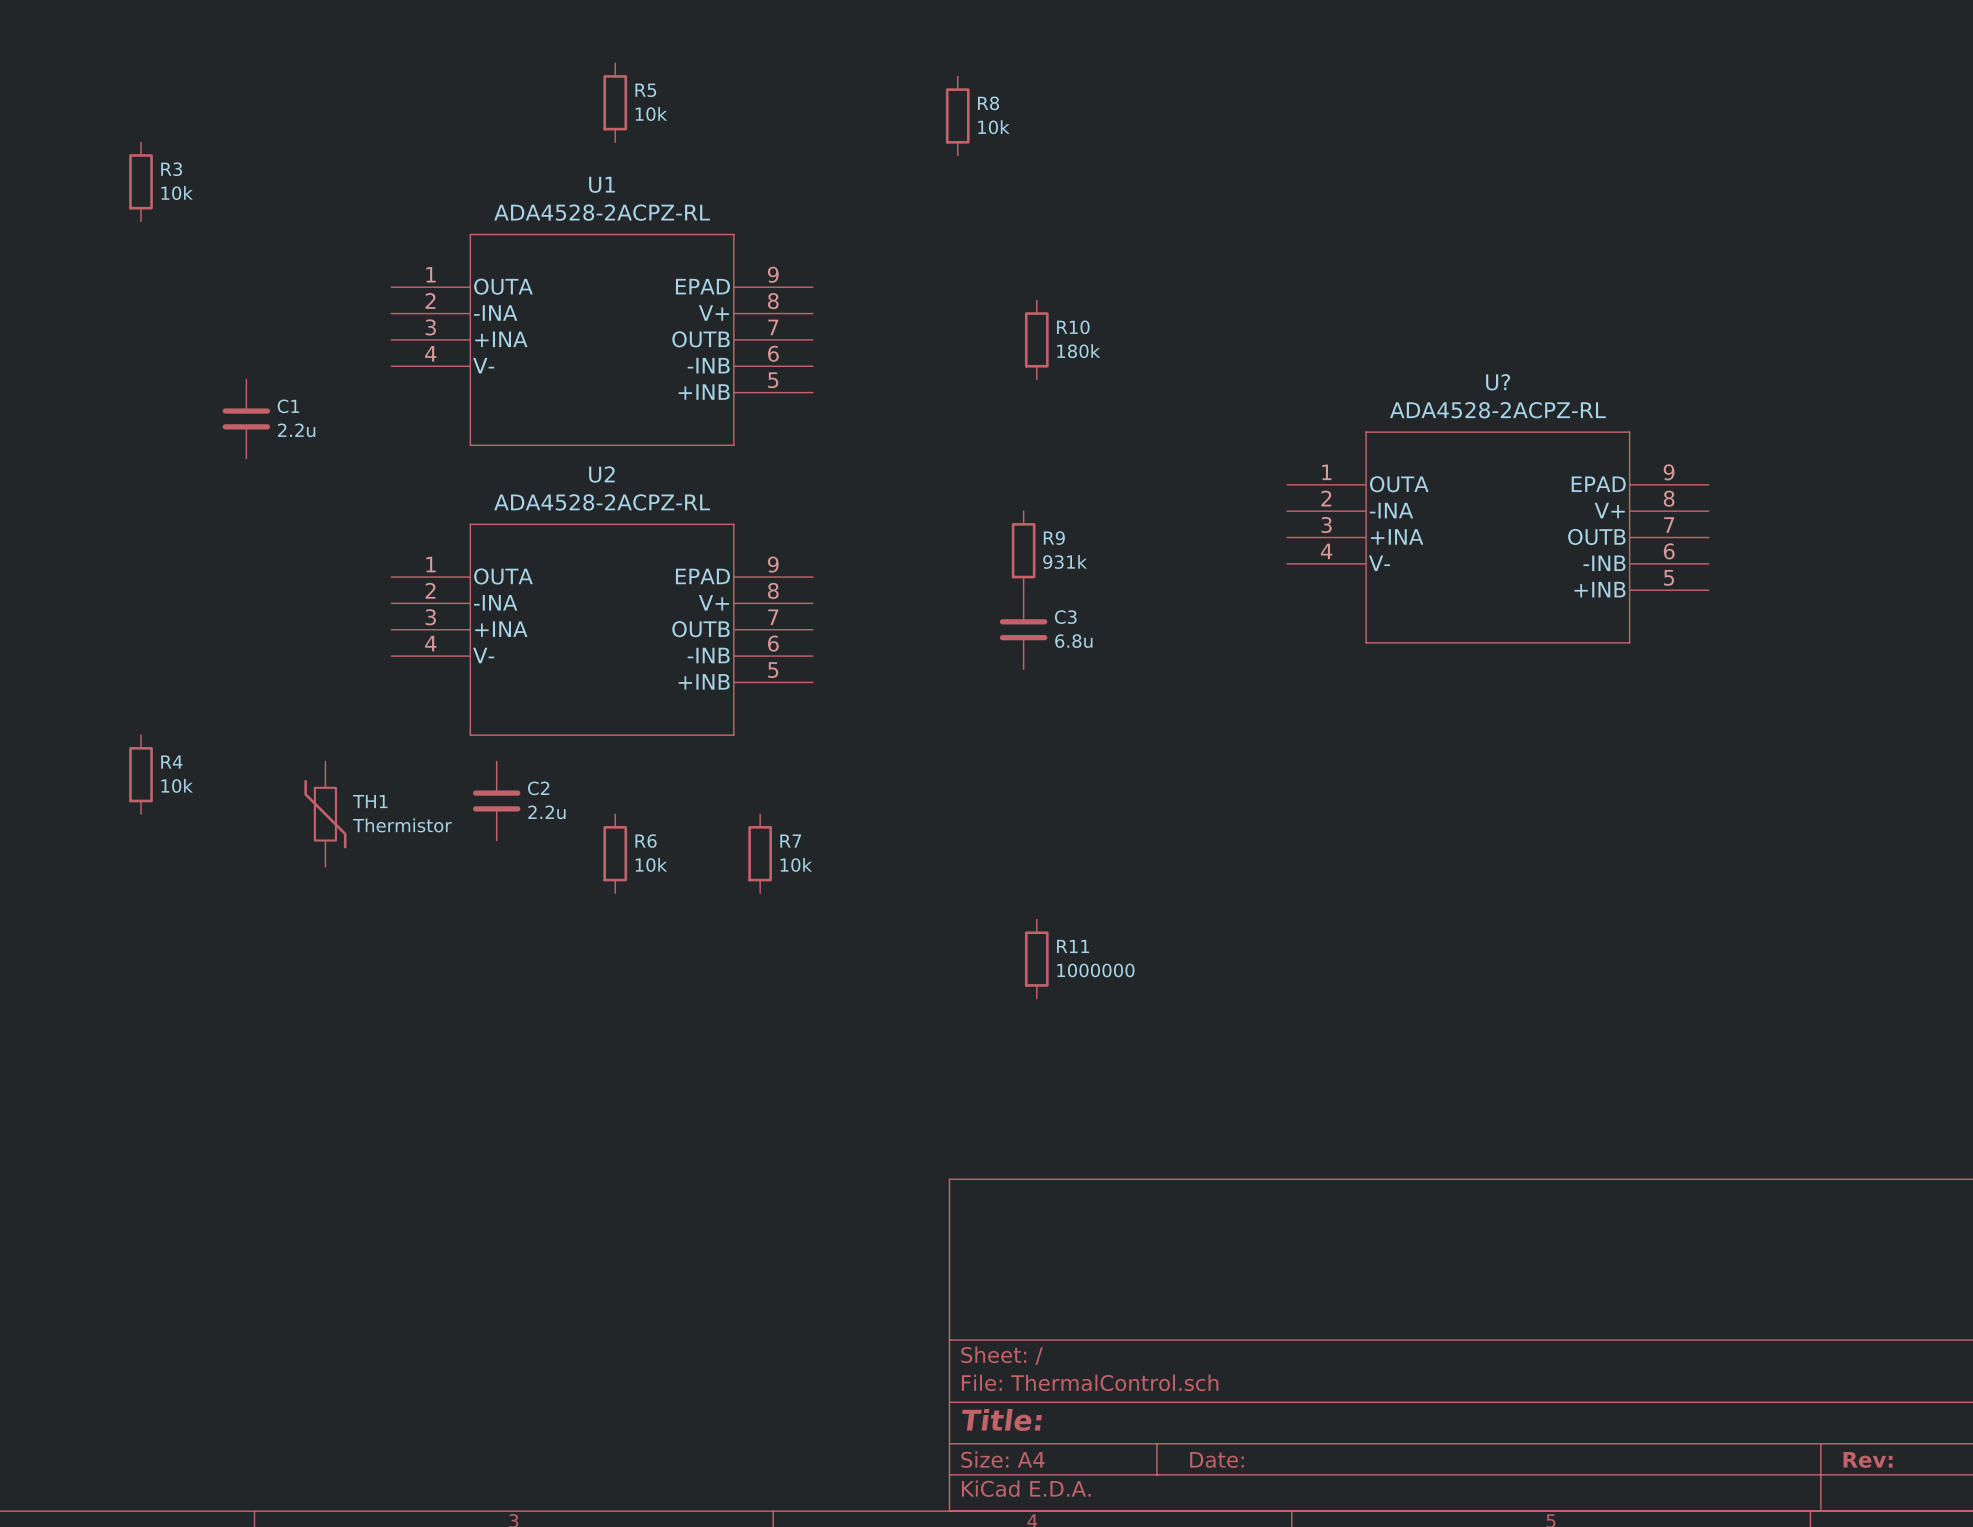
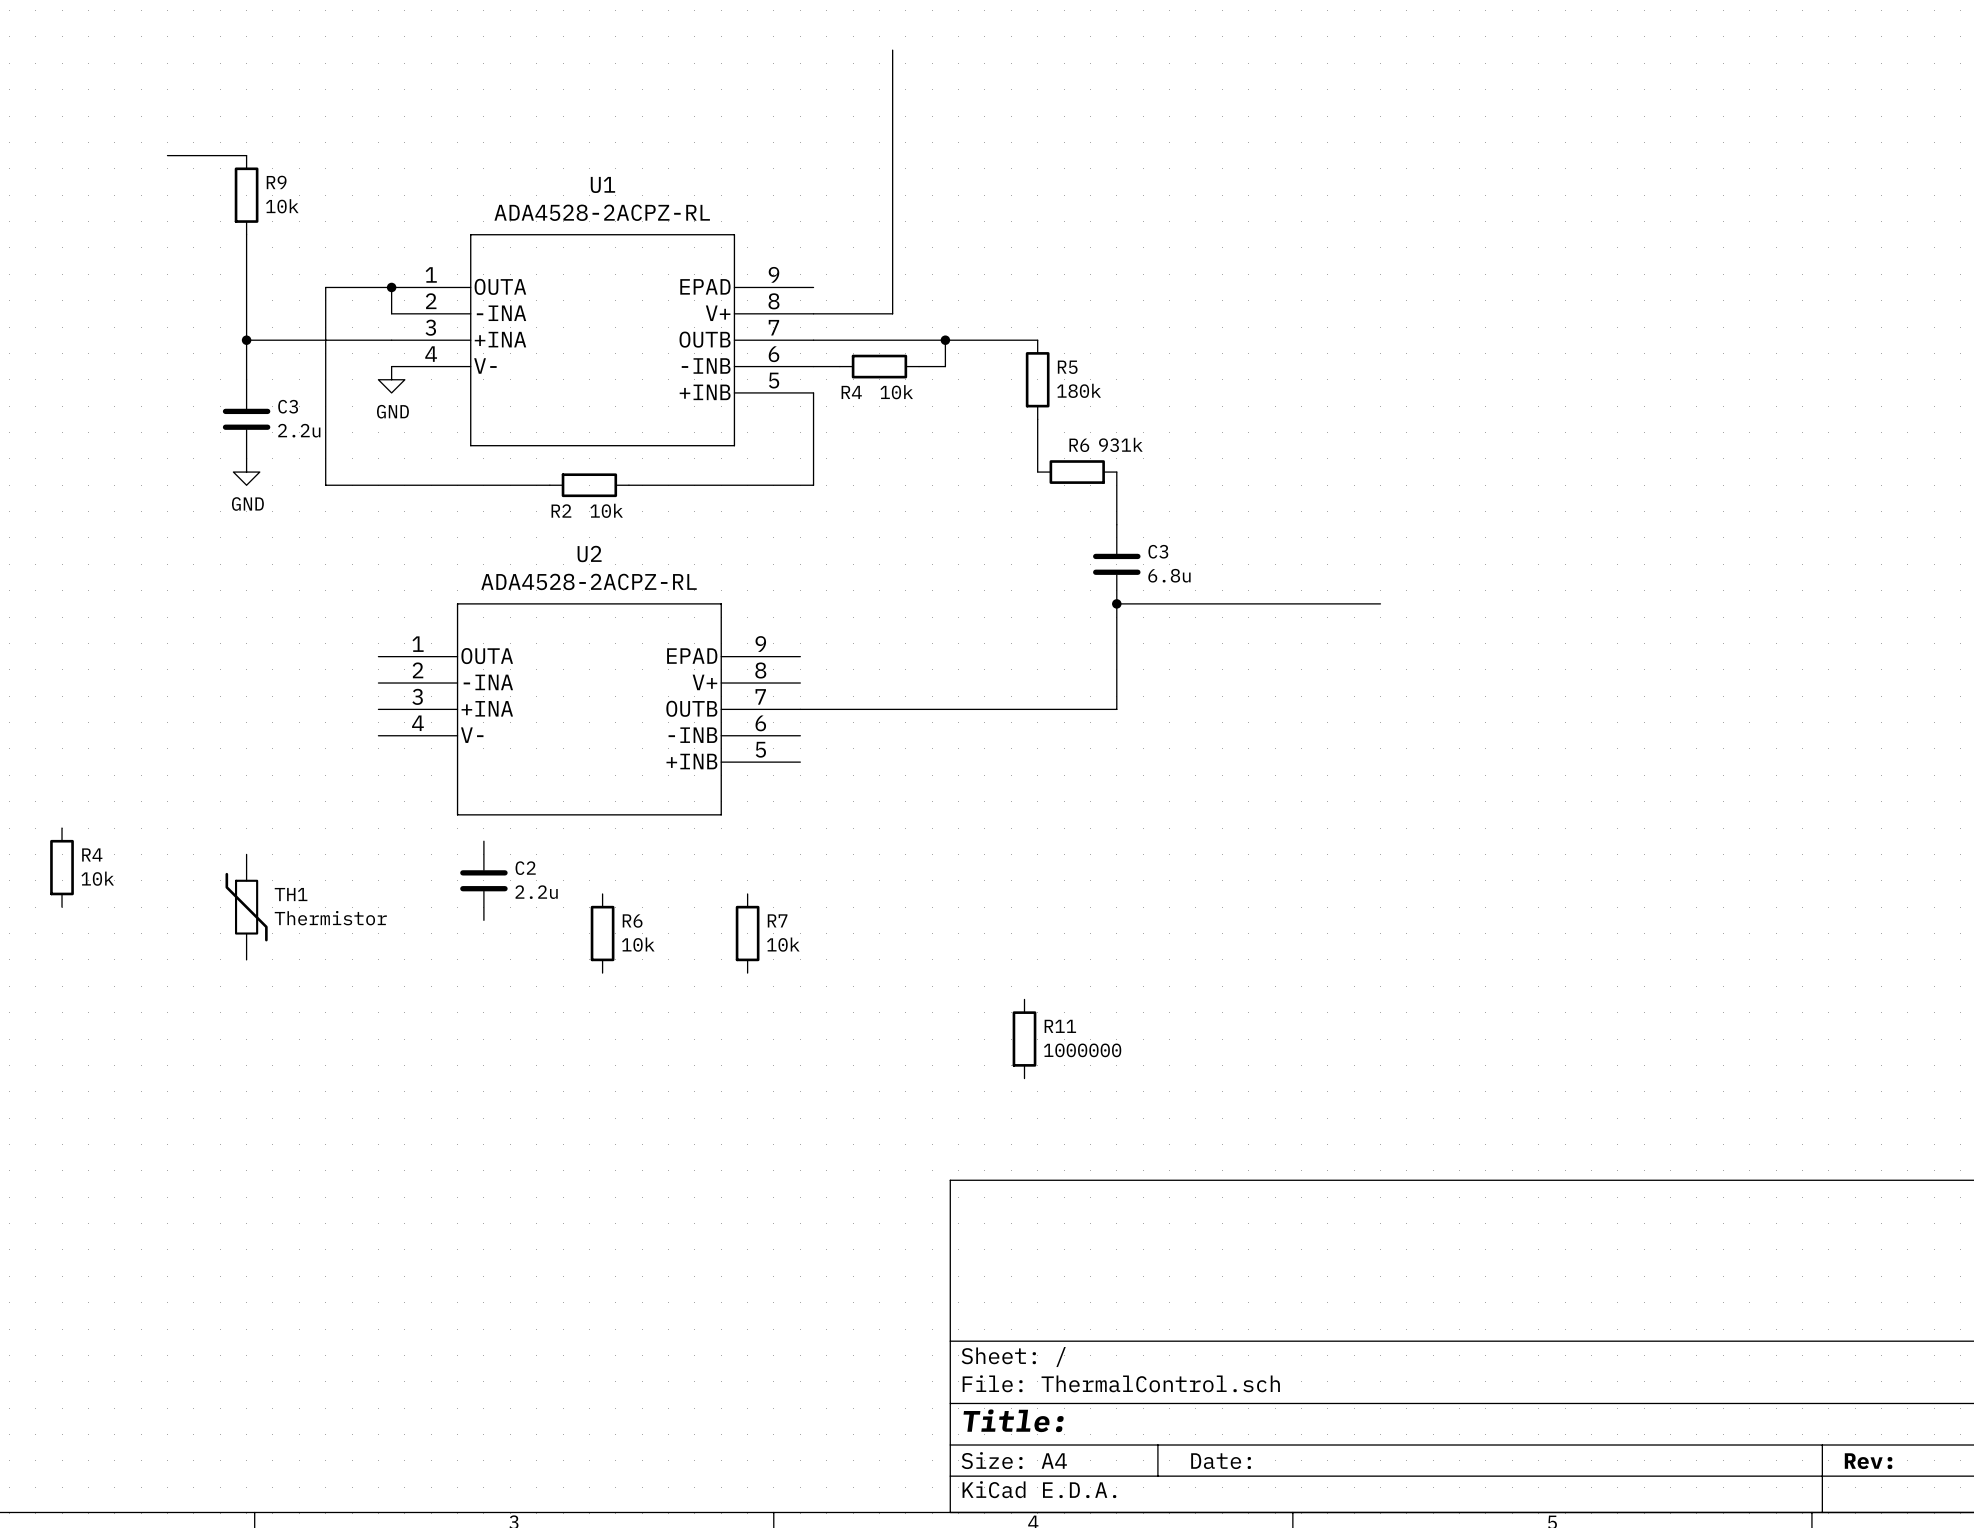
wire: none -> (892, 50) (892, 313) (813, 313)
R5 position: (615, 102) -> (1037, 379)
R5 value: 10k (651, 114) -> 180k (1079, 390)
R8: 10k (957, 115) -> none
wire: none -> (167, 155) (246, 155)
R3: 10k (140, 181) -> none
wire: none -> (246, 234) (246, 379)
junction: none -> (391, 287)
wire: none -> (391, 313) (391, 287) (325, 287) (325, 485) (549, 485)
wire: none -> (246, 340) (391, 340)
junction: none -> (246, 340)
wire: none -> (813, 340) (1037, 340)
wire: none -> (945, 340) (945, 366) (919, 366)
junction: none -> (945, 340)
R10: 180k (1036, 339) -> none
wire: none -> (813, 366) (839, 366)
R4: none -> 10k (879, 366)
power symbol: none -> GND (391, 379)
wire: none -> (813, 392) (813, 485) (628, 485)
C1 name: C1 (288, 406) -> C3 (288, 406)
wire: none -> (1037, 419) (1037, 472)
power symbol: none -> GND (246, 472)
R6: none -> 931k (1077, 472)
wire: none -> (1116, 472) (1116, 524)
R2: none -> 10k (589, 485)
U?: ADA4528-2ACPZ-RL (1497, 537) -> none
R9 position: (1023, 550) -> (246, 195)
R9 value: 931k (1065, 561) -> 10k (282, 206)
junction: none -> (1116, 603)
wire: none -> (1380, 603) (1116, 603) (1116, 709) (800, 709)
U2 position: (602, 629) -> (589, 709)
C3 position: (1023, 629) -> (1116, 564)
R4 position: (140, 774) -> (62, 867)
C2 position: (496, 800) -> (483, 880)
TH1 position: (325, 814) -> (246, 907)
R6 position: (615, 853) -> (602, 933)
R7 position: (760, 853) -> (747, 933)
R11 position: (1036, 959) -> (1024, 1039)

